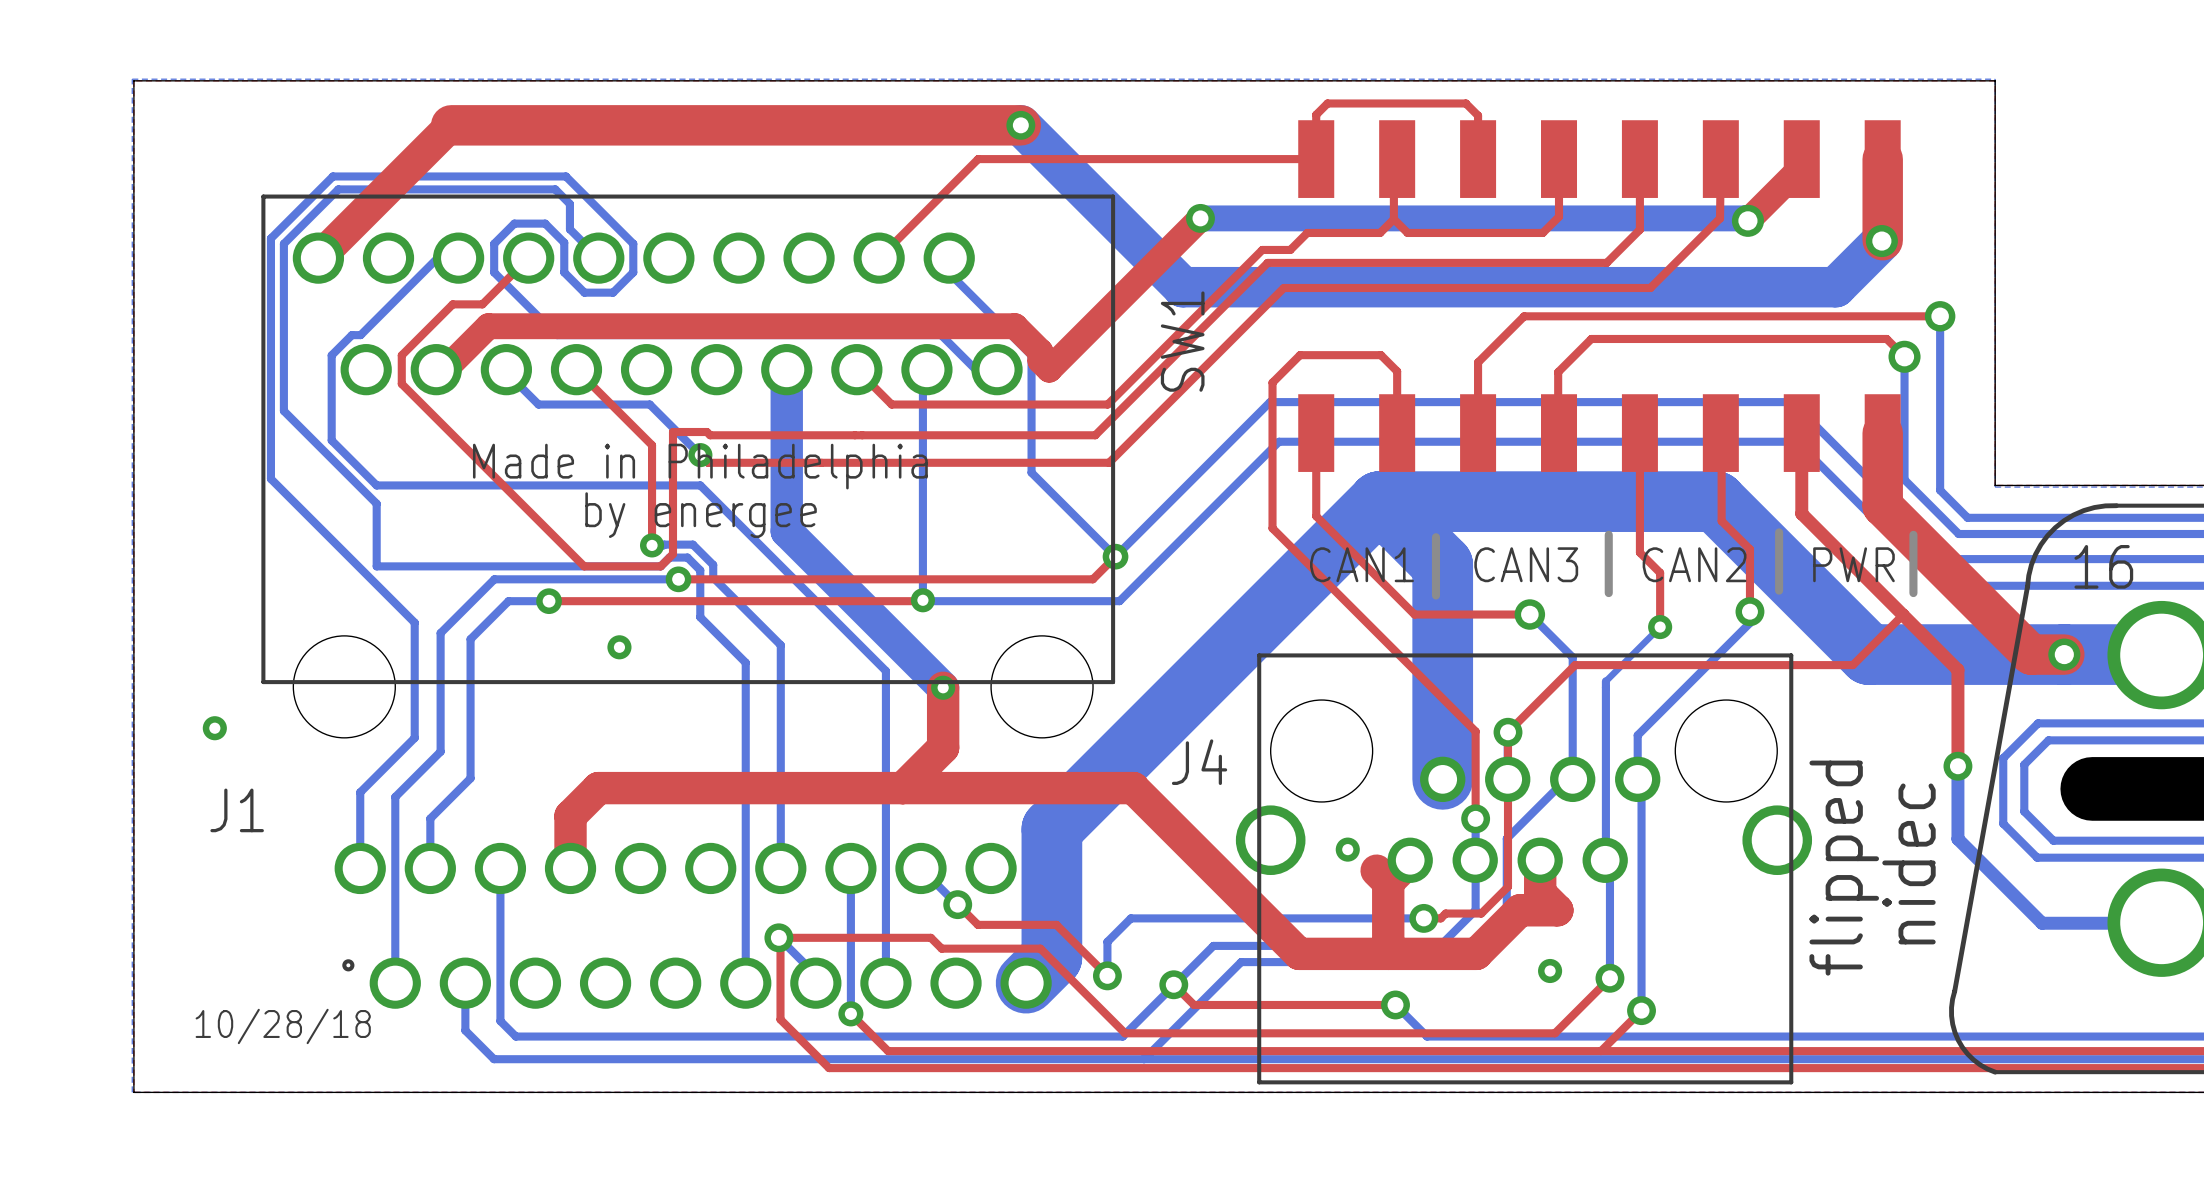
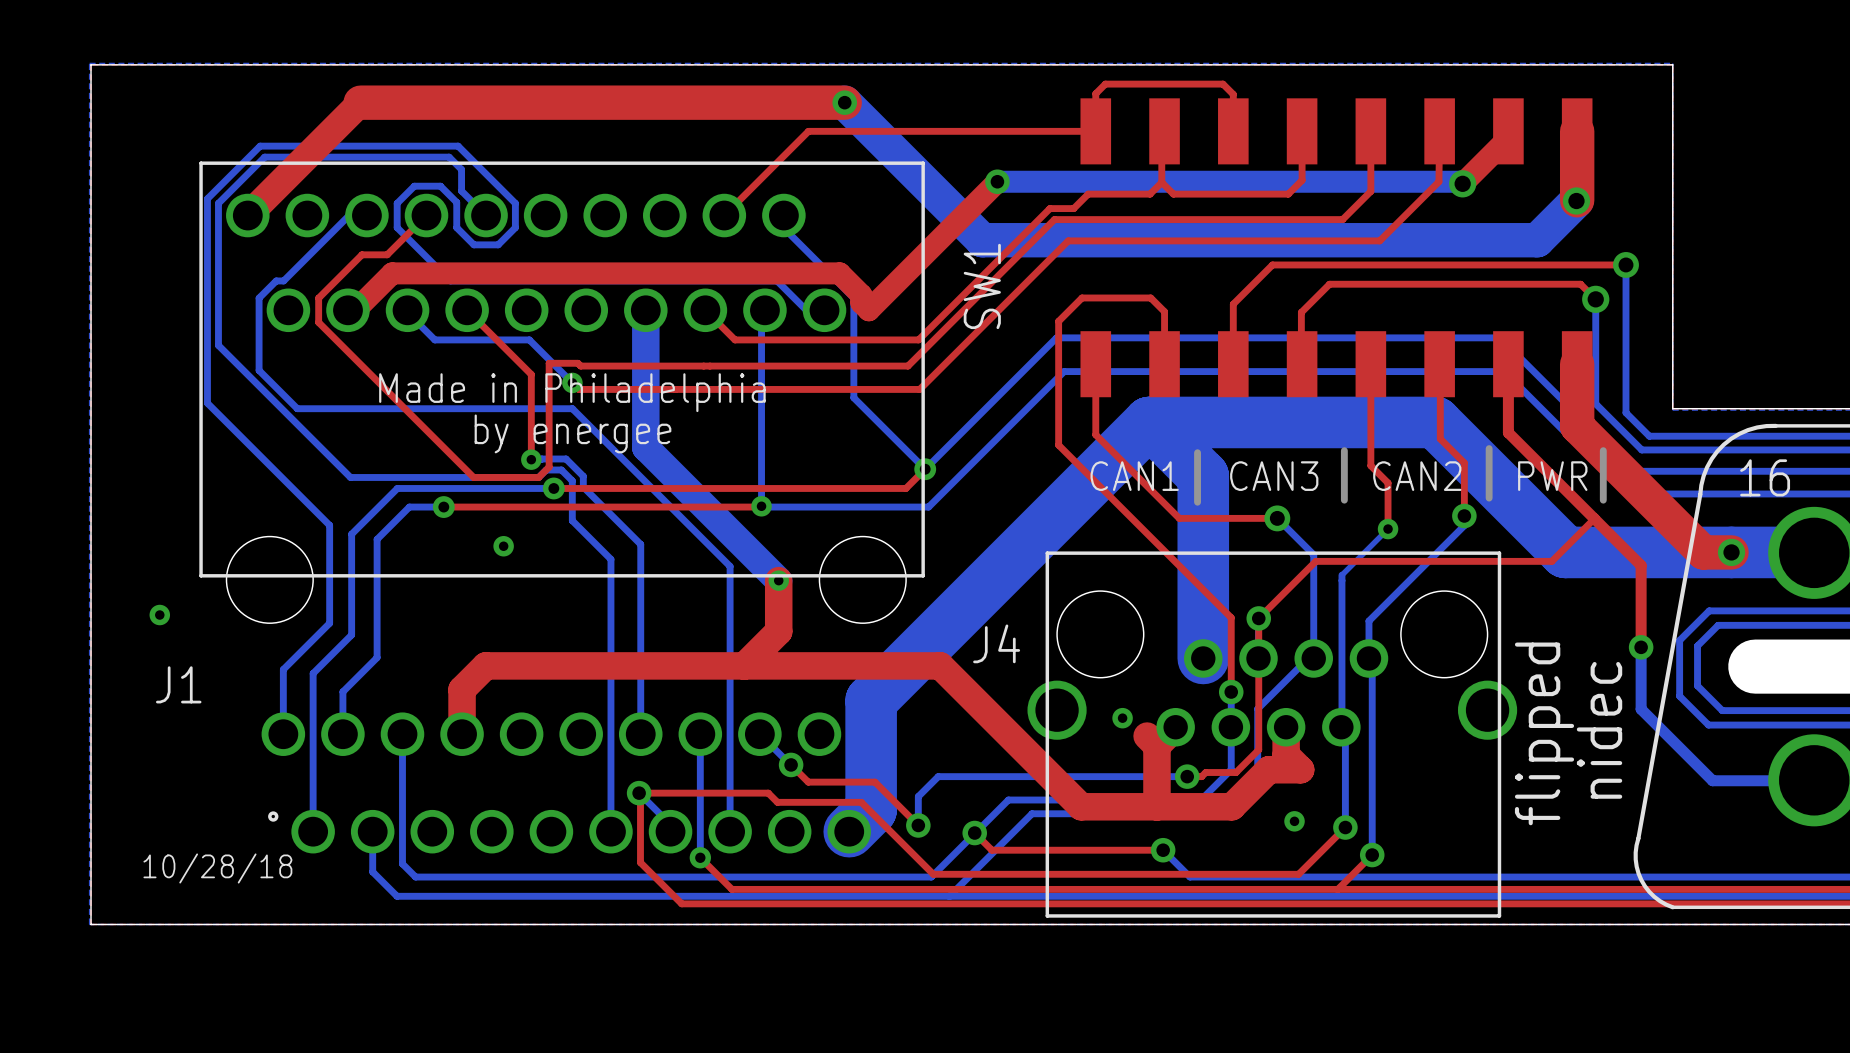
bottom track: (376, 503) (376, 566) (439, 566) -> (297, 424) (350, 477)

